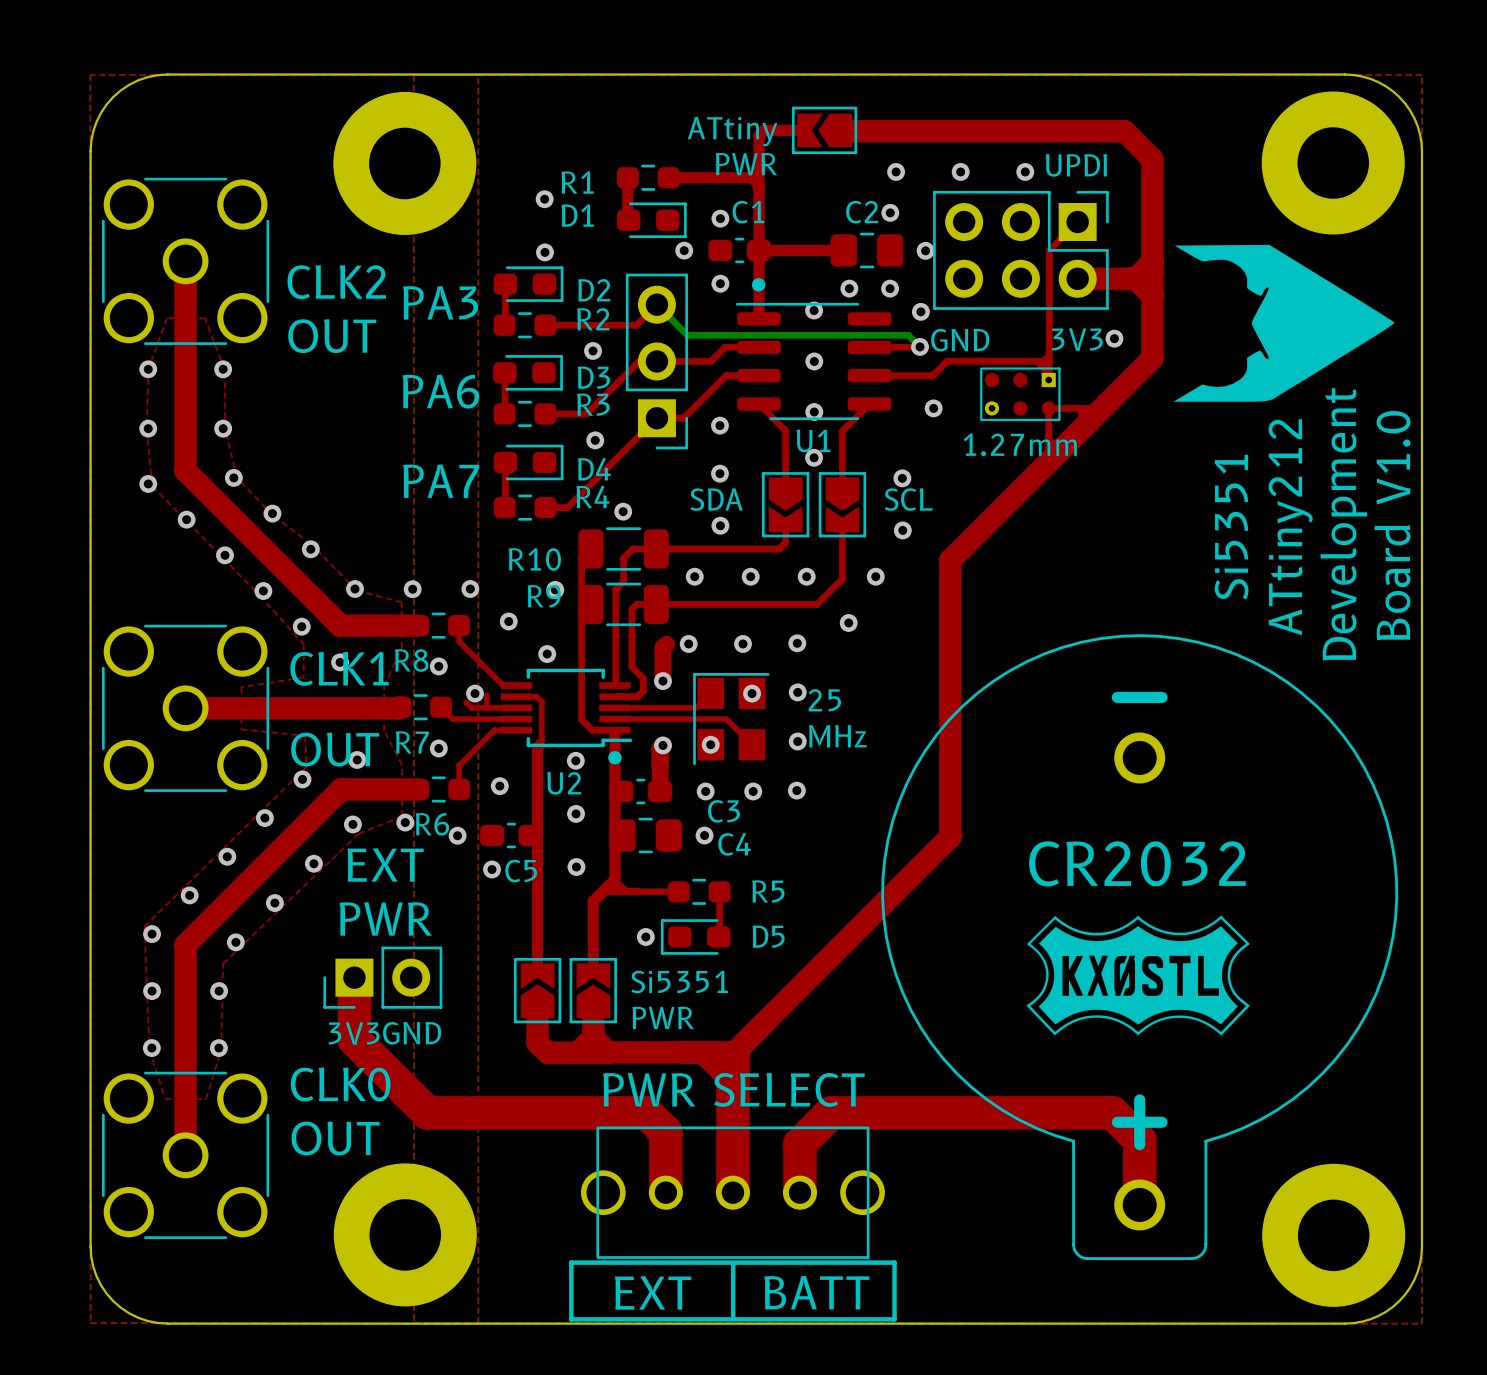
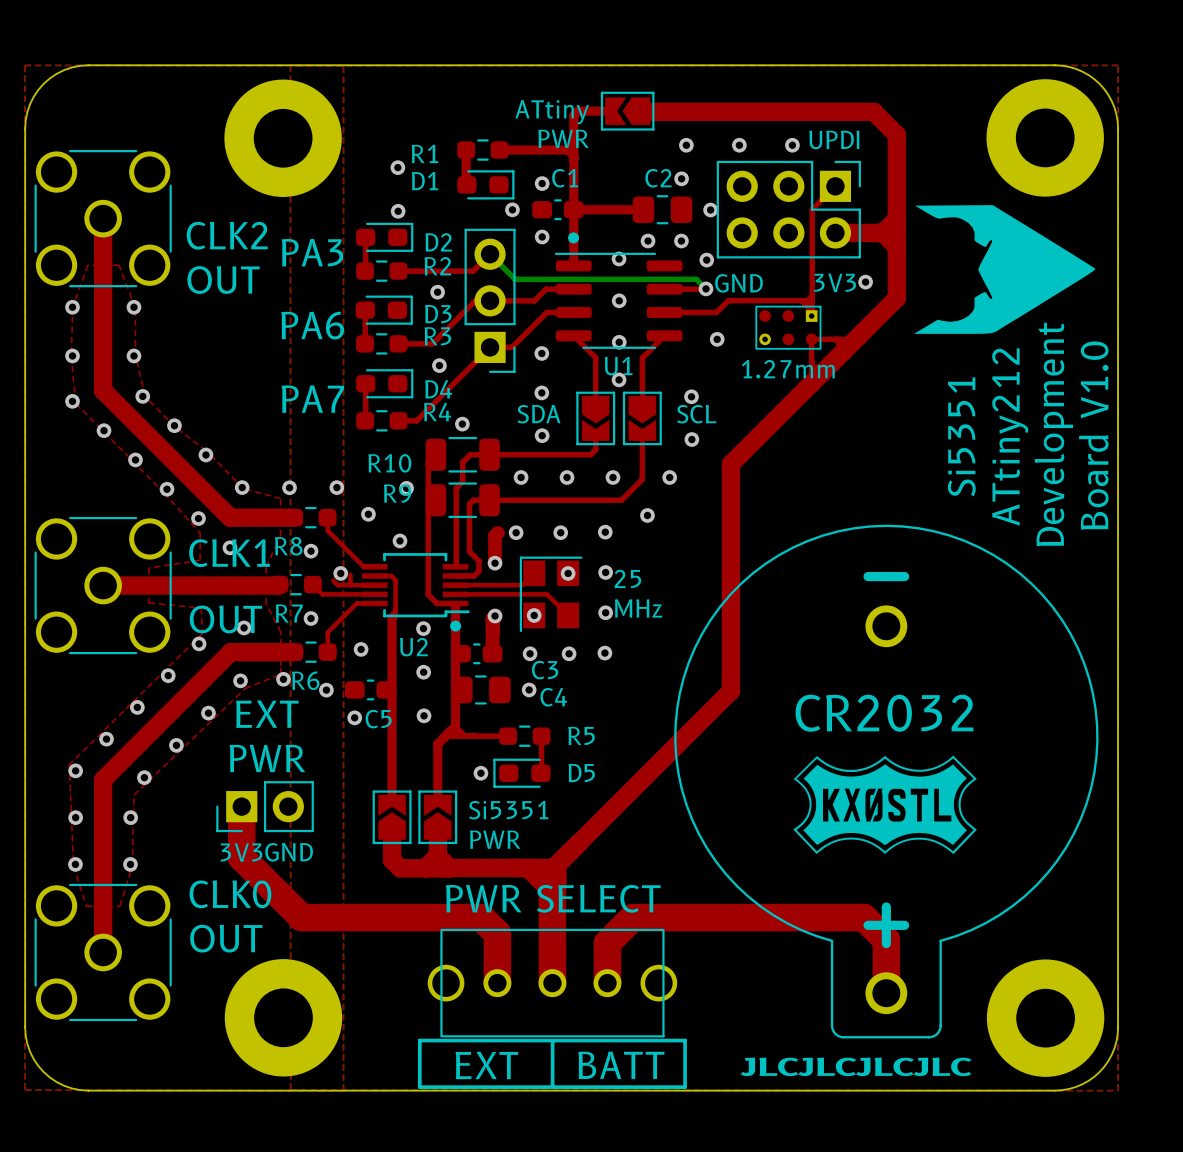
text: none -> JLCJLCJLCJLC (856, 1066)

